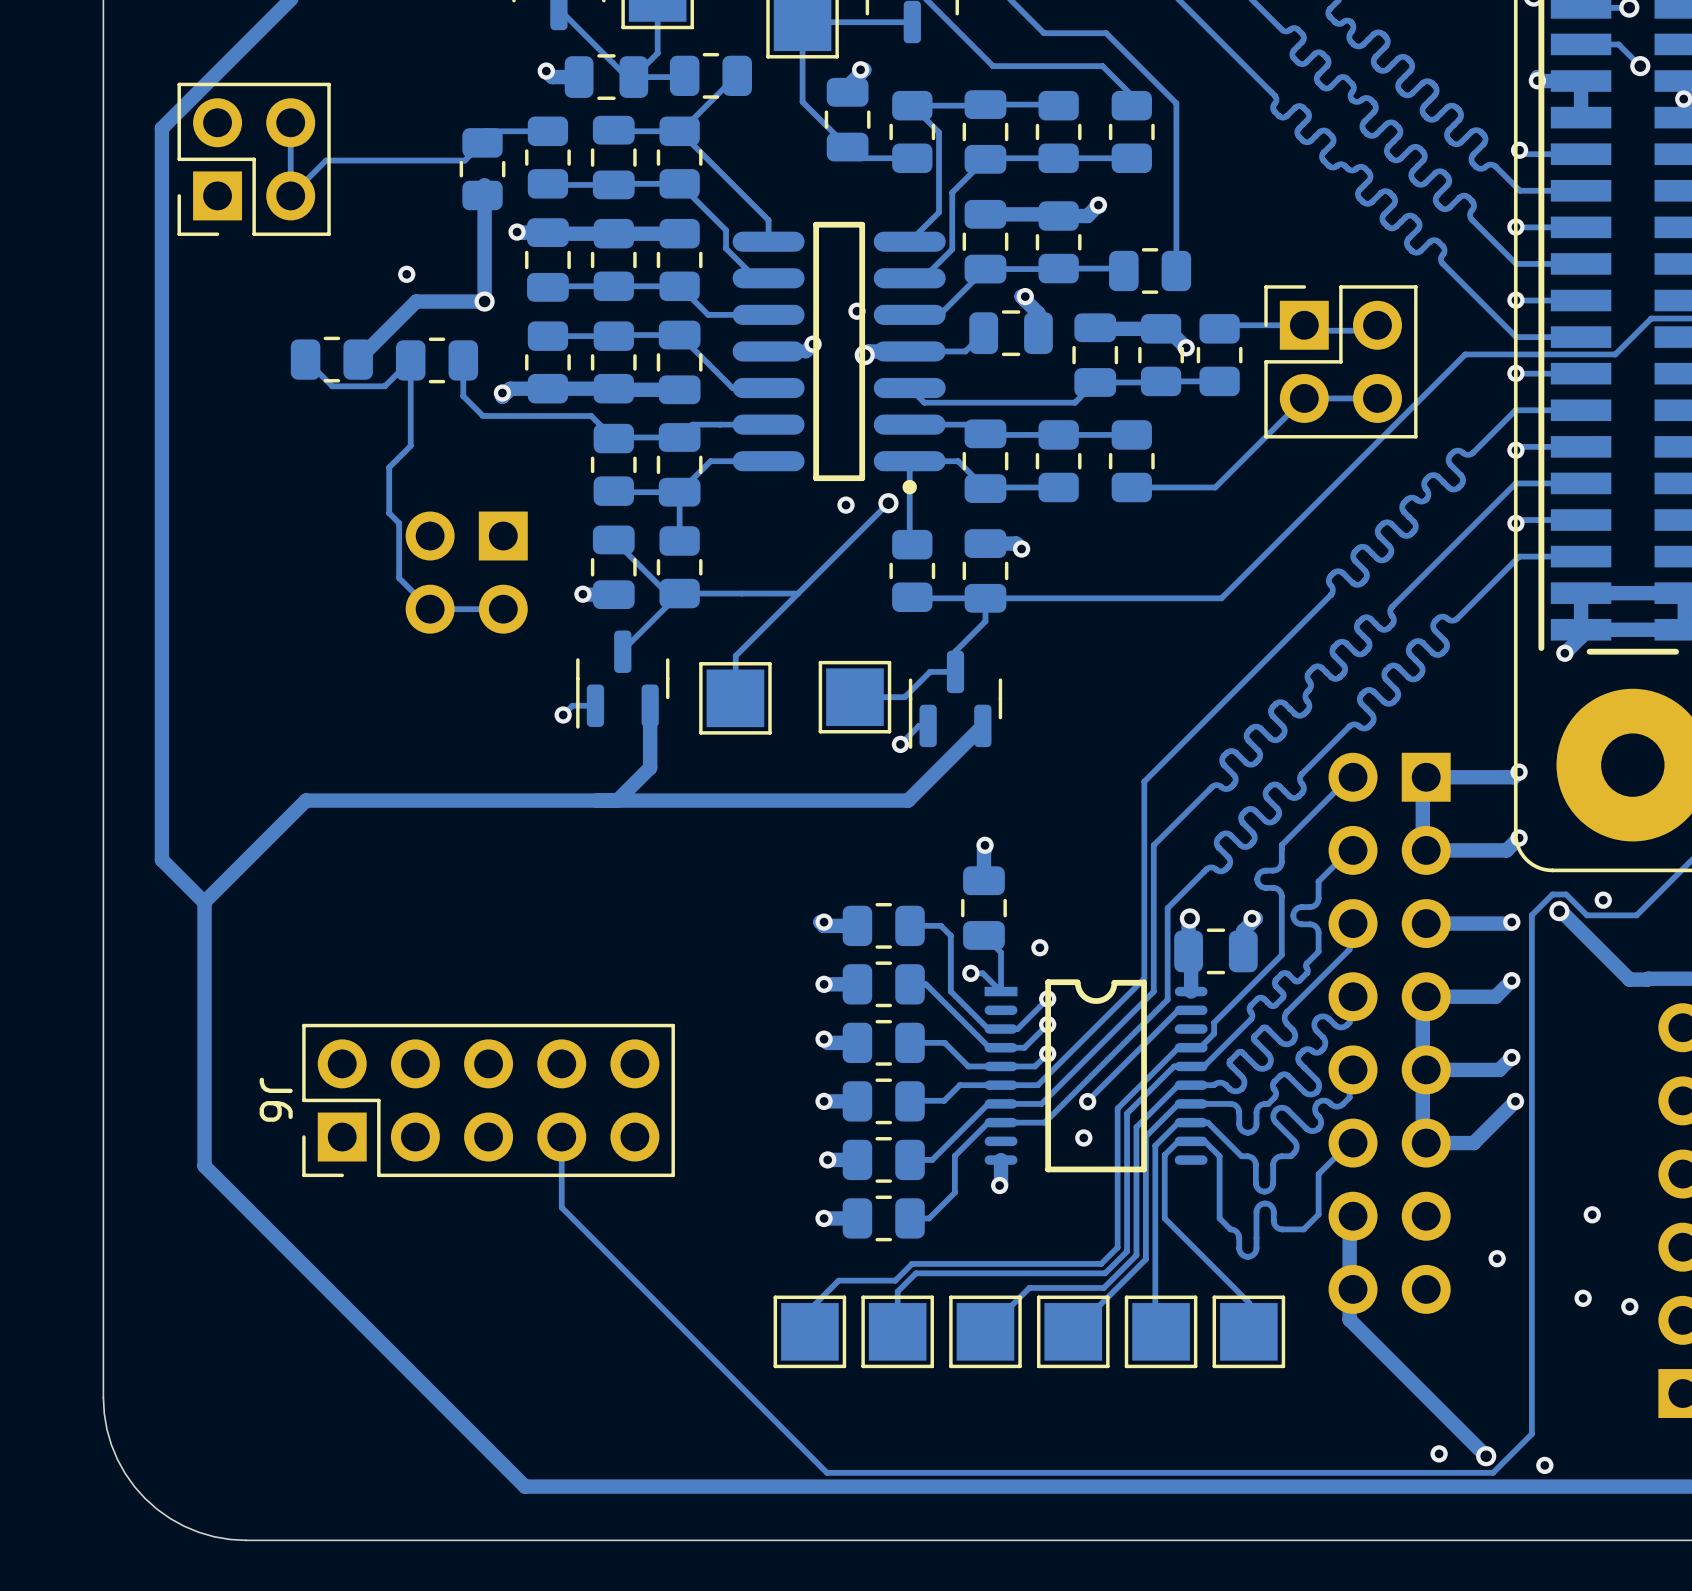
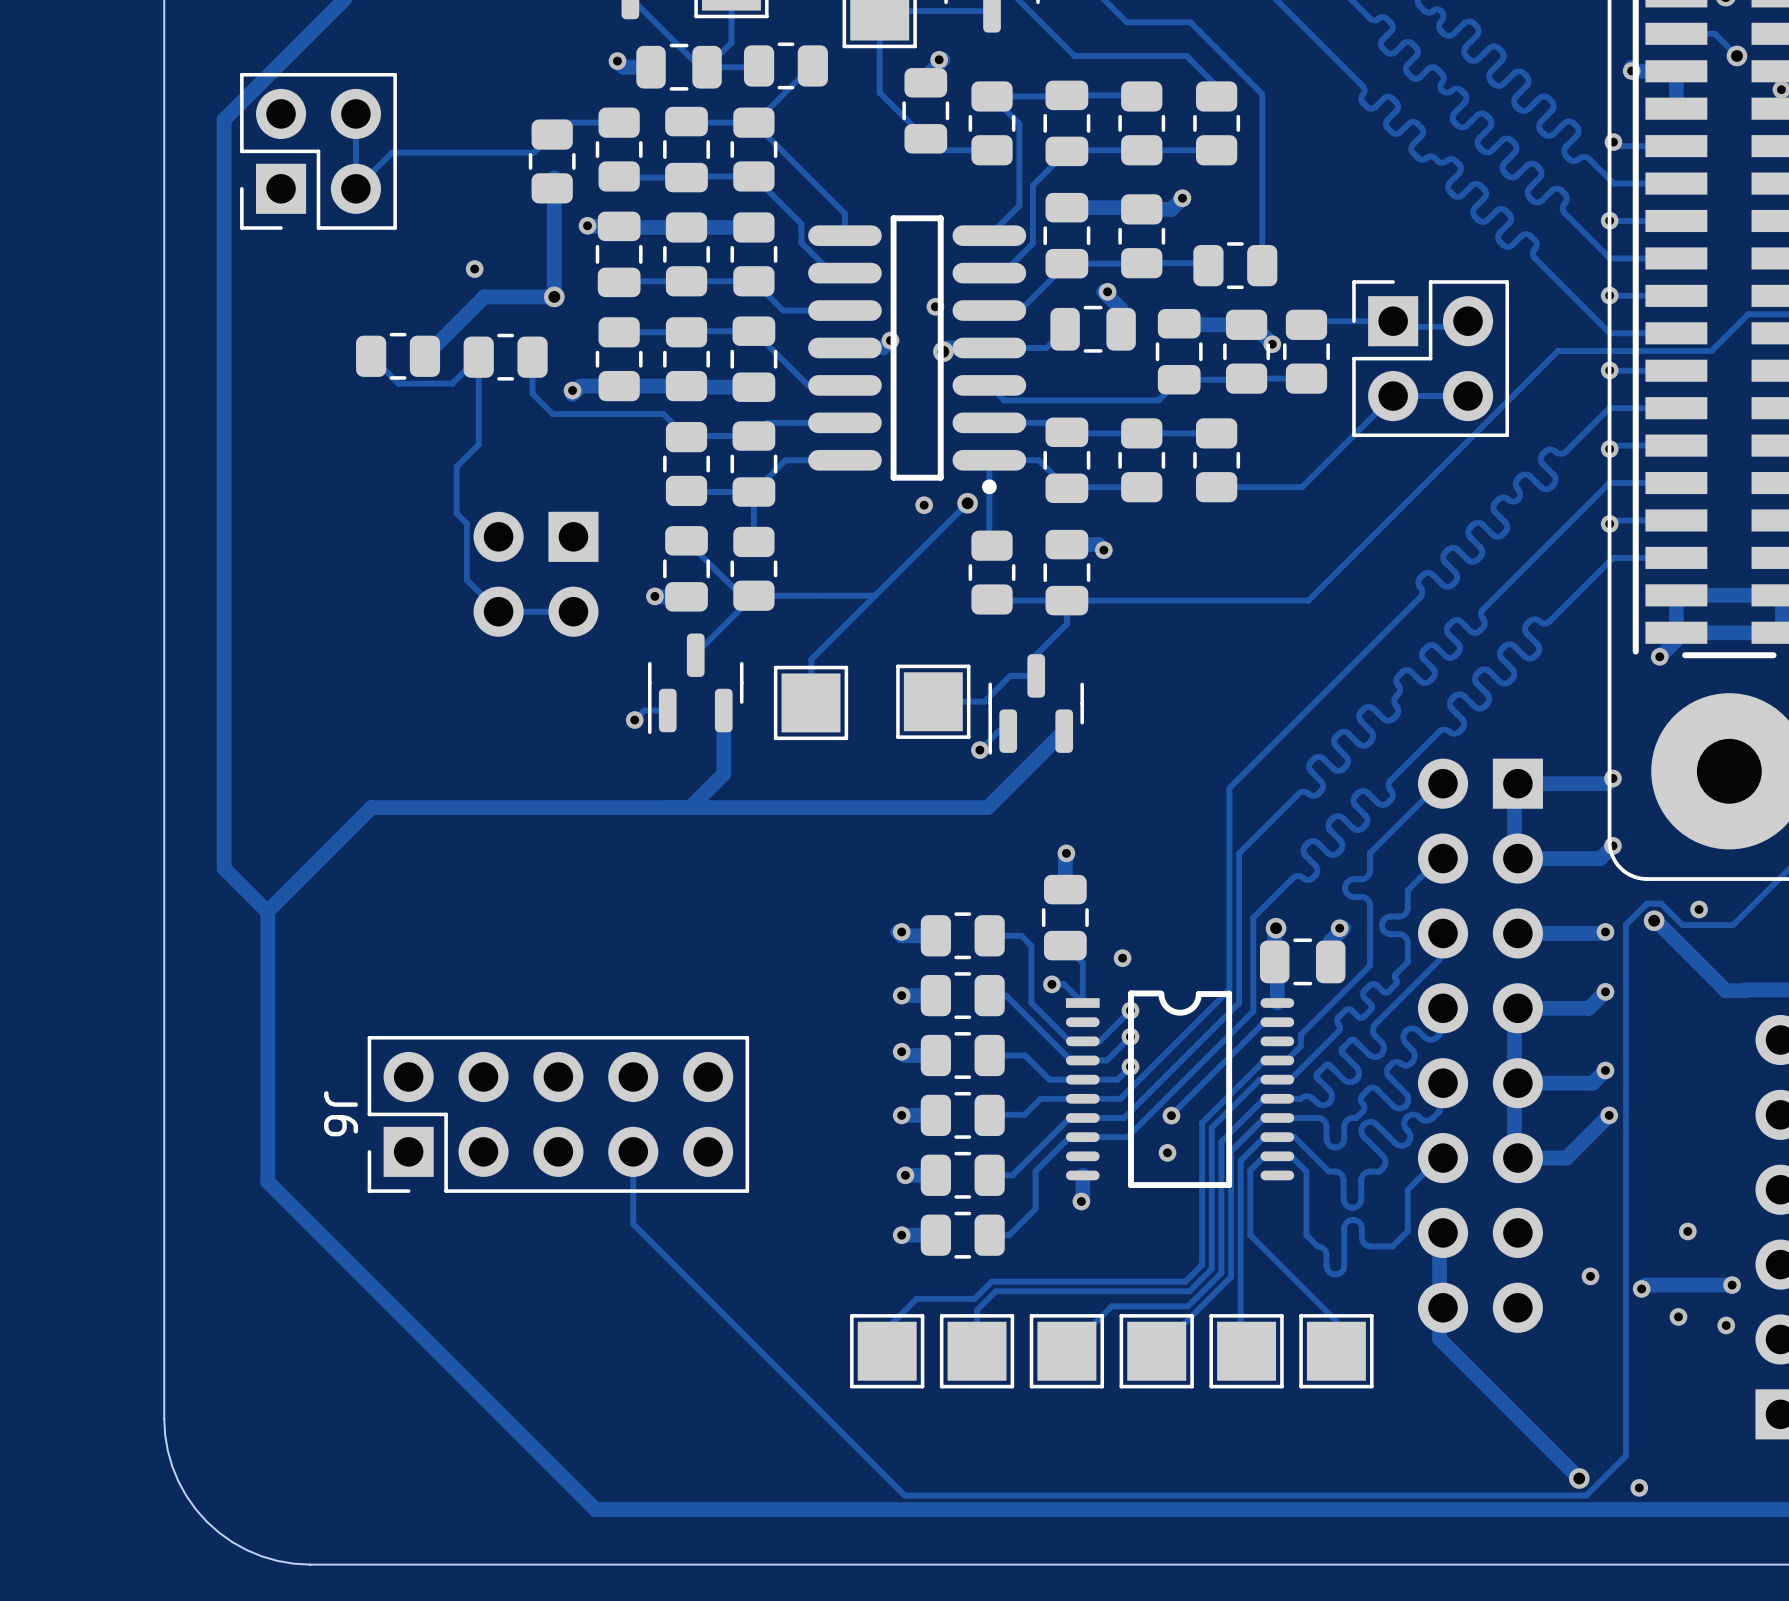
track: none -> (1732, 1285) (1645, 1285) (1641, 1288)
via: none -> (1732, 1285)
via: none -> (1641, 1288)
via: (1439, 1453) -> none

